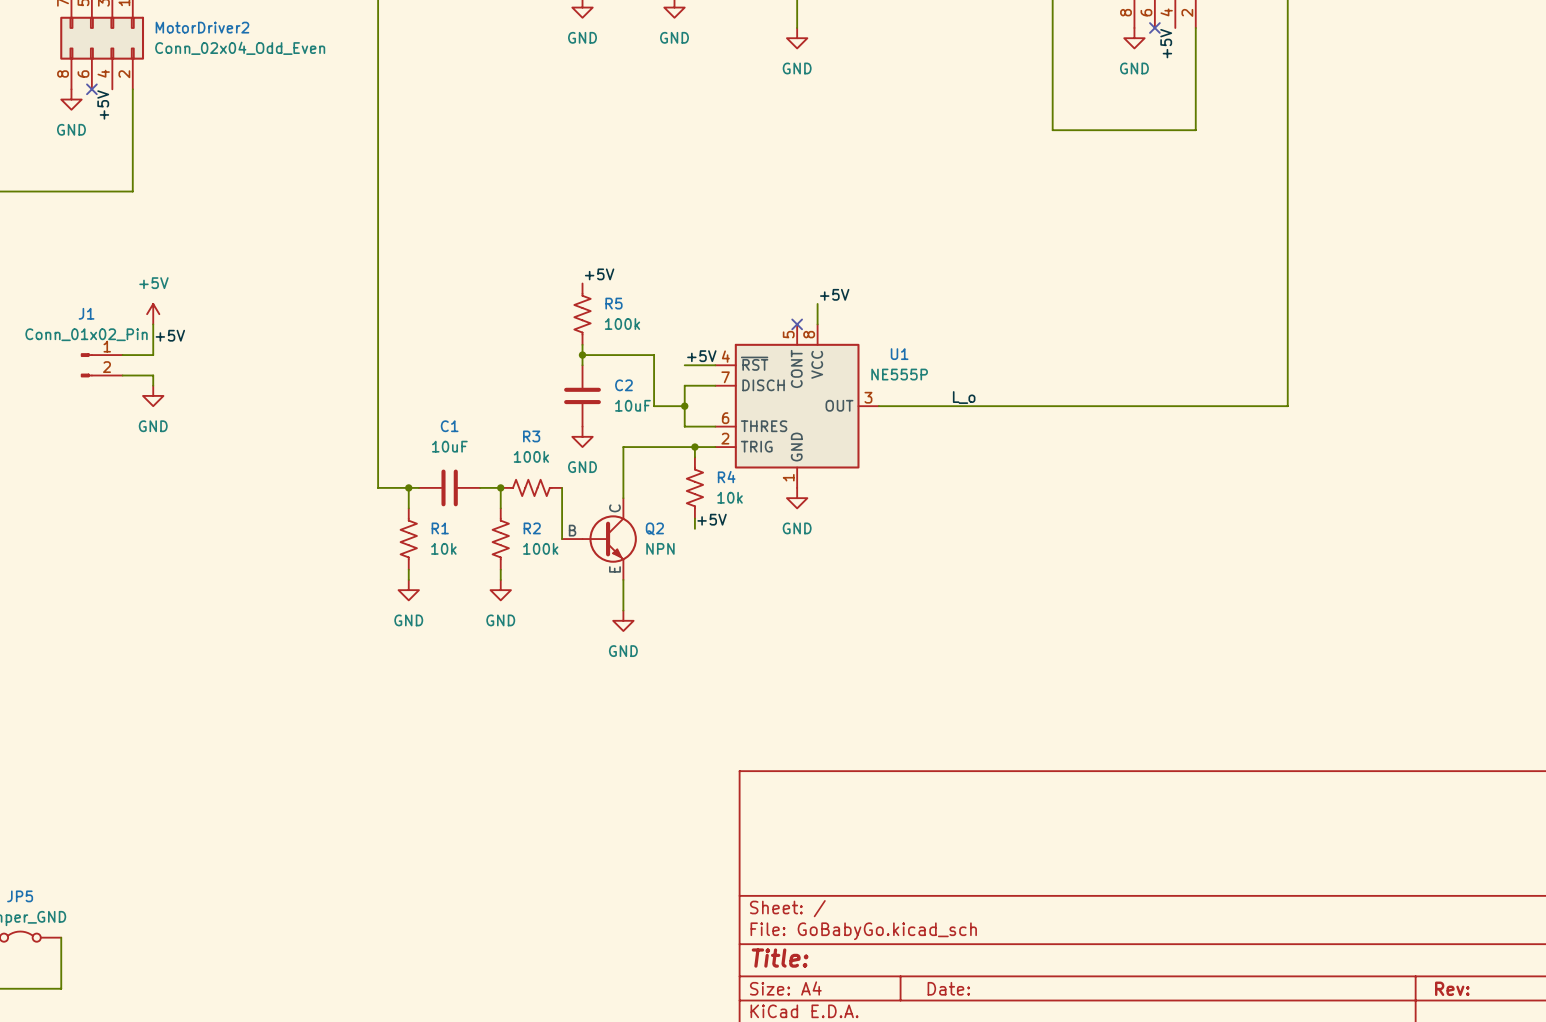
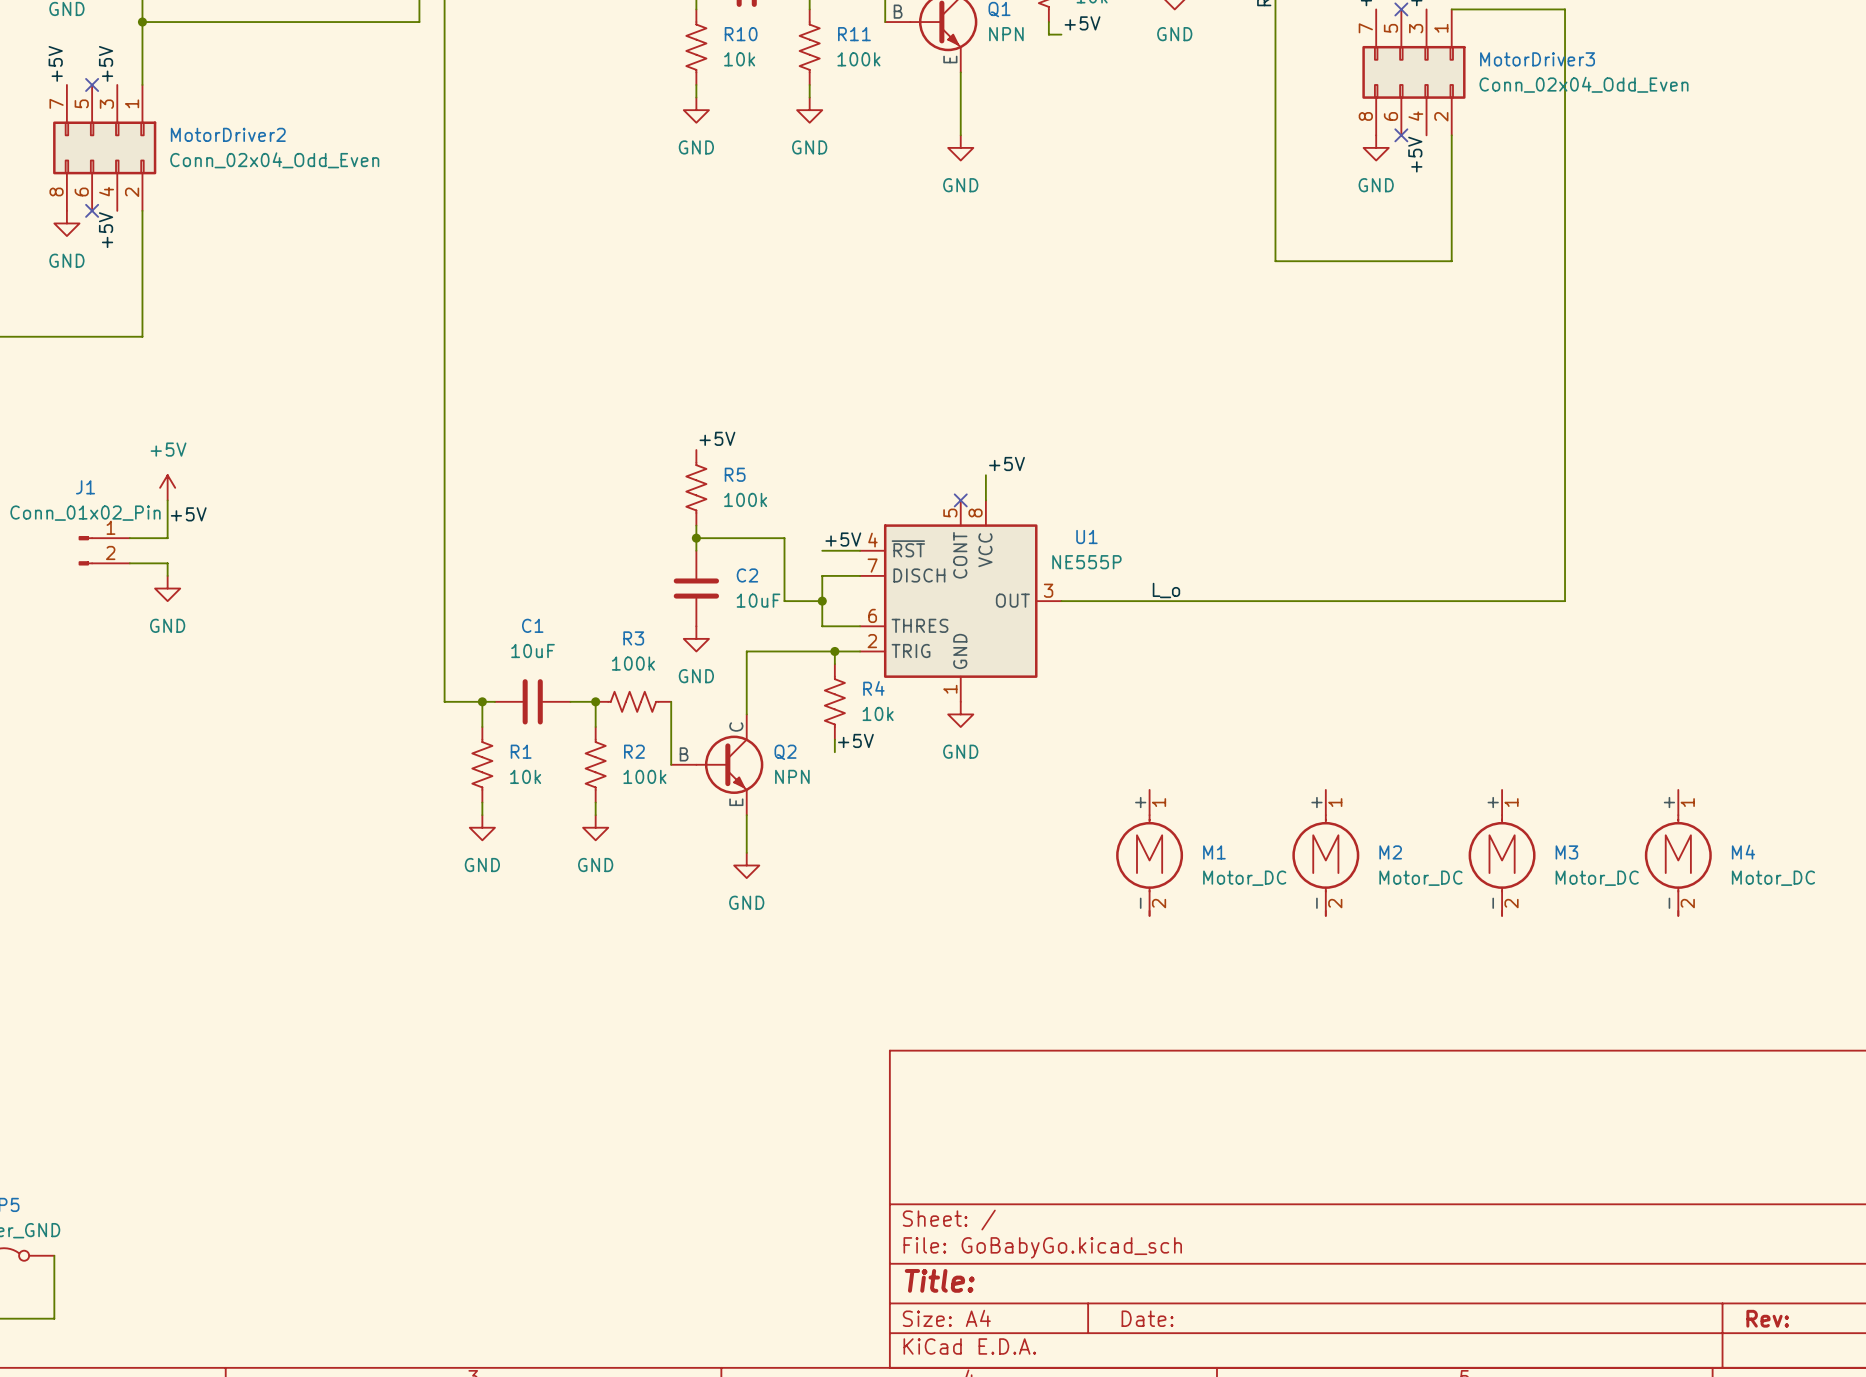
M1: none -> Motor_DC (1149, 852)
M2: none -> Motor_DC (1325, 852)
M3: none -> Motor_DC (1502, 852)
M4: none -> Motor_DC (1678, 852)

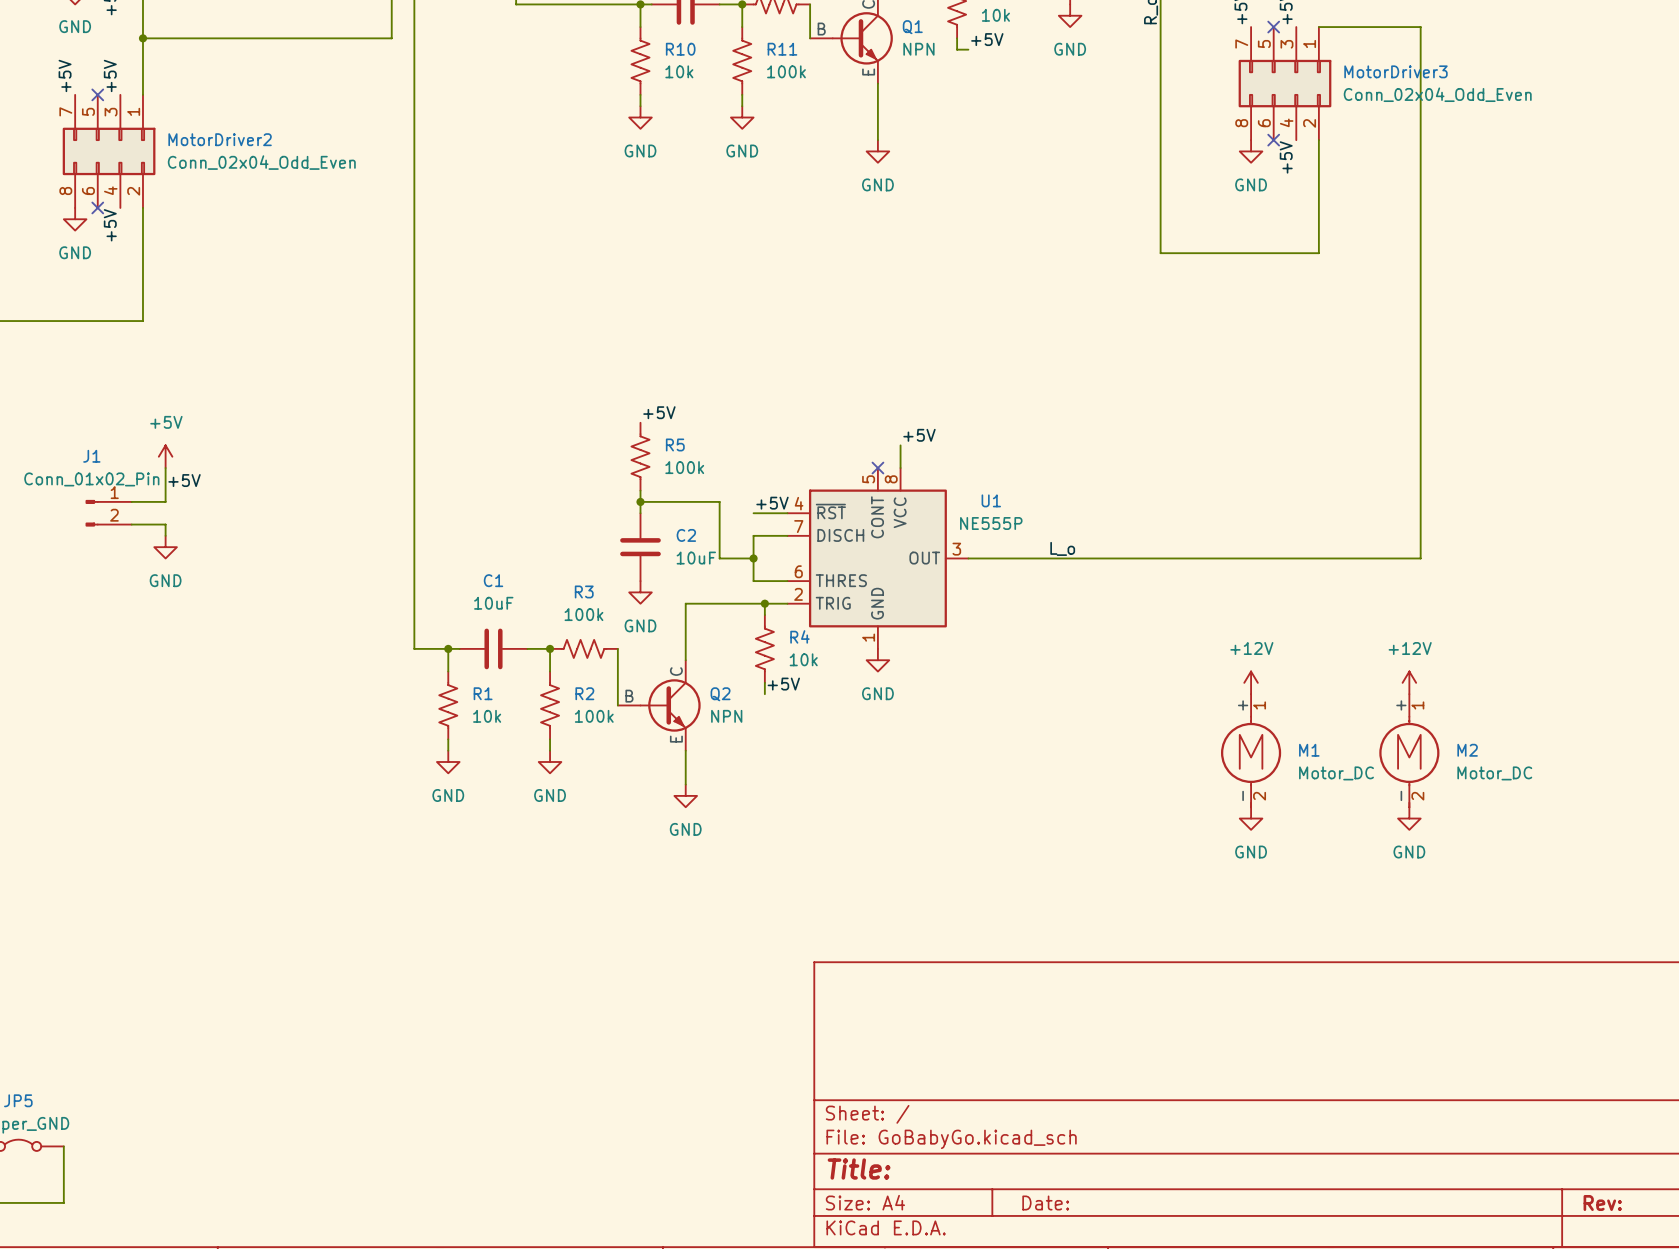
power symbol: none -> +12V (1251, 682)
power symbol: none -> +12V (1409, 682)
M1 position: (1149, 852) -> (1251, 750)
M2 position: (1325, 852) -> (1409, 750)
M3: Motor_DC (1502, 852) -> none
M4: Motor_DC (1678, 852) -> none
power symbol: none -> GND (1251, 818)
power symbol: none -> GND (1409, 818)

